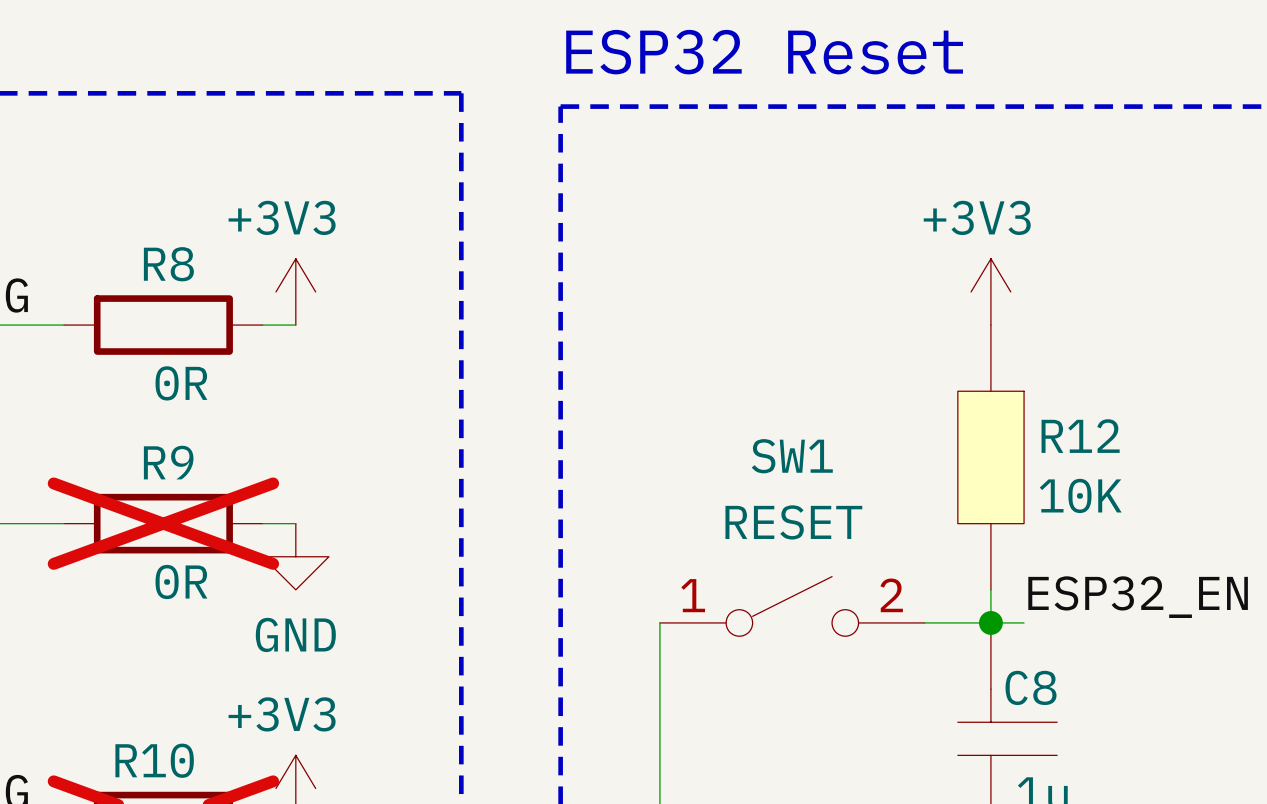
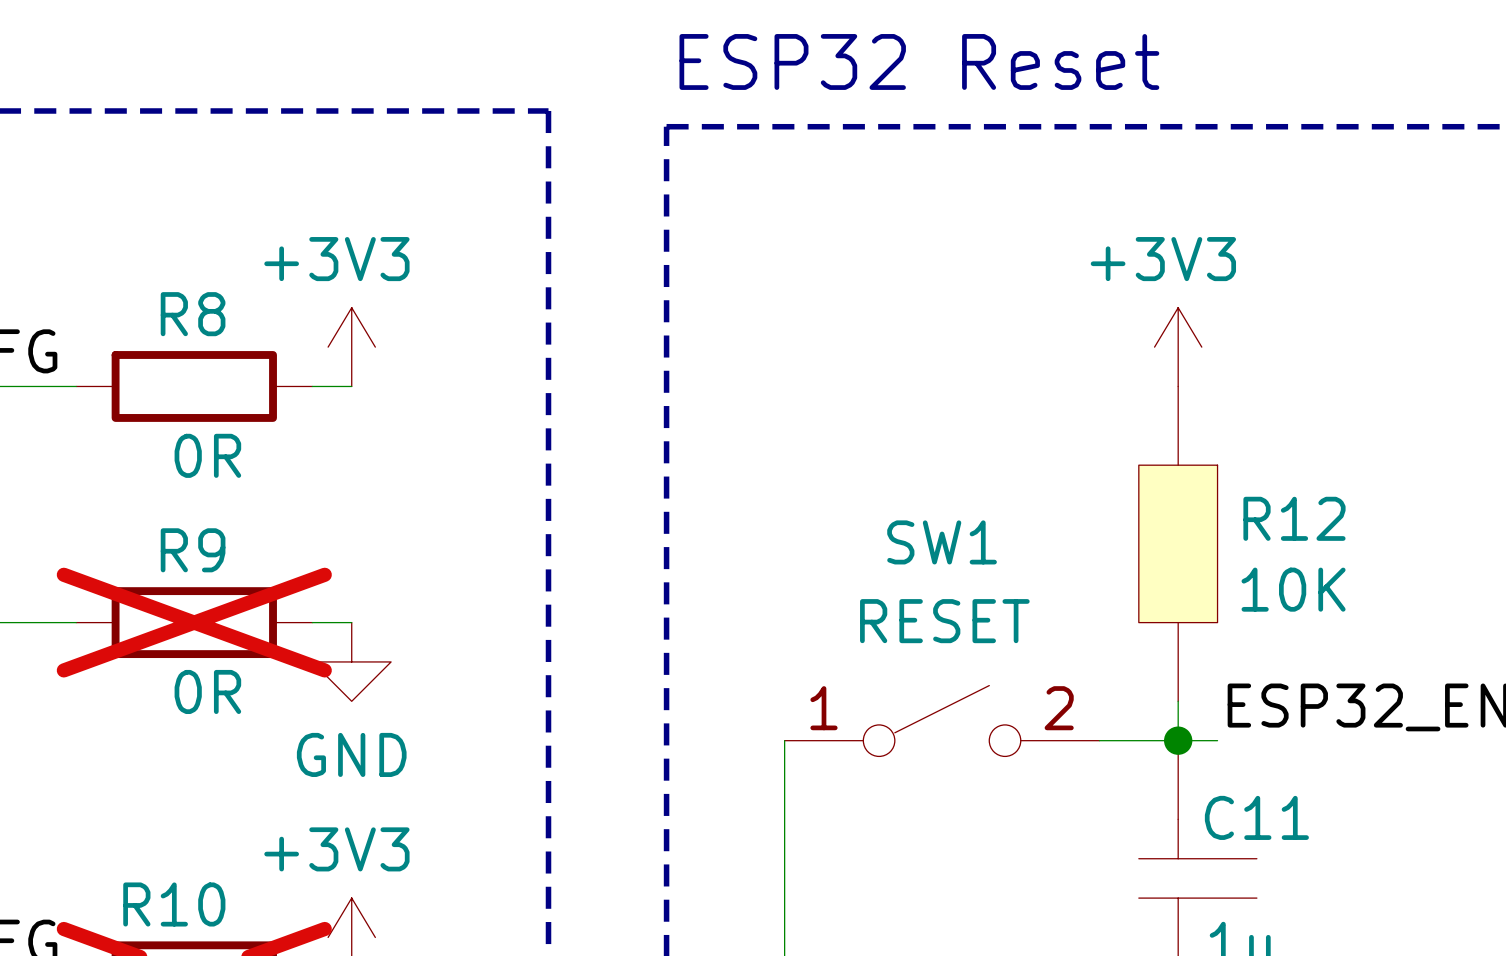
C8 name: C8 (1031, 687) -> C11 (1256, 817)

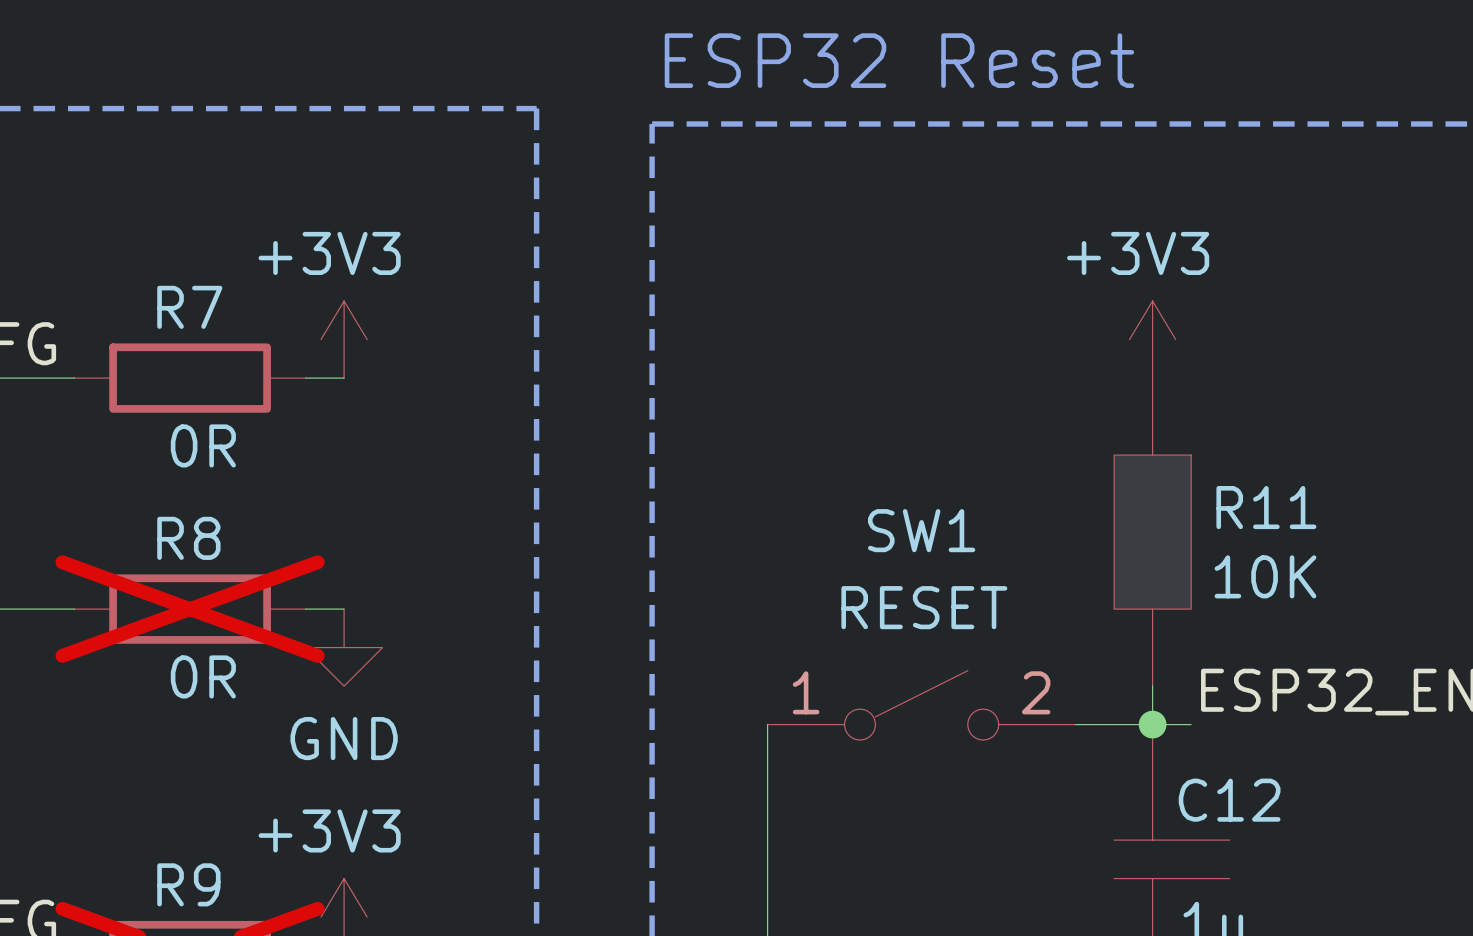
R8 name: R8 (193, 314) -> R7 (189, 307)
R12 name: R12 (1294, 518) -> R11 (1266, 507)
R9 name: R9 (193, 550) -> R8 (188, 538)
C11 name: C11 (1256, 817) -> C12 (1229, 800)
R10 name: R10 (174, 904) -> R9 (188, 884)

